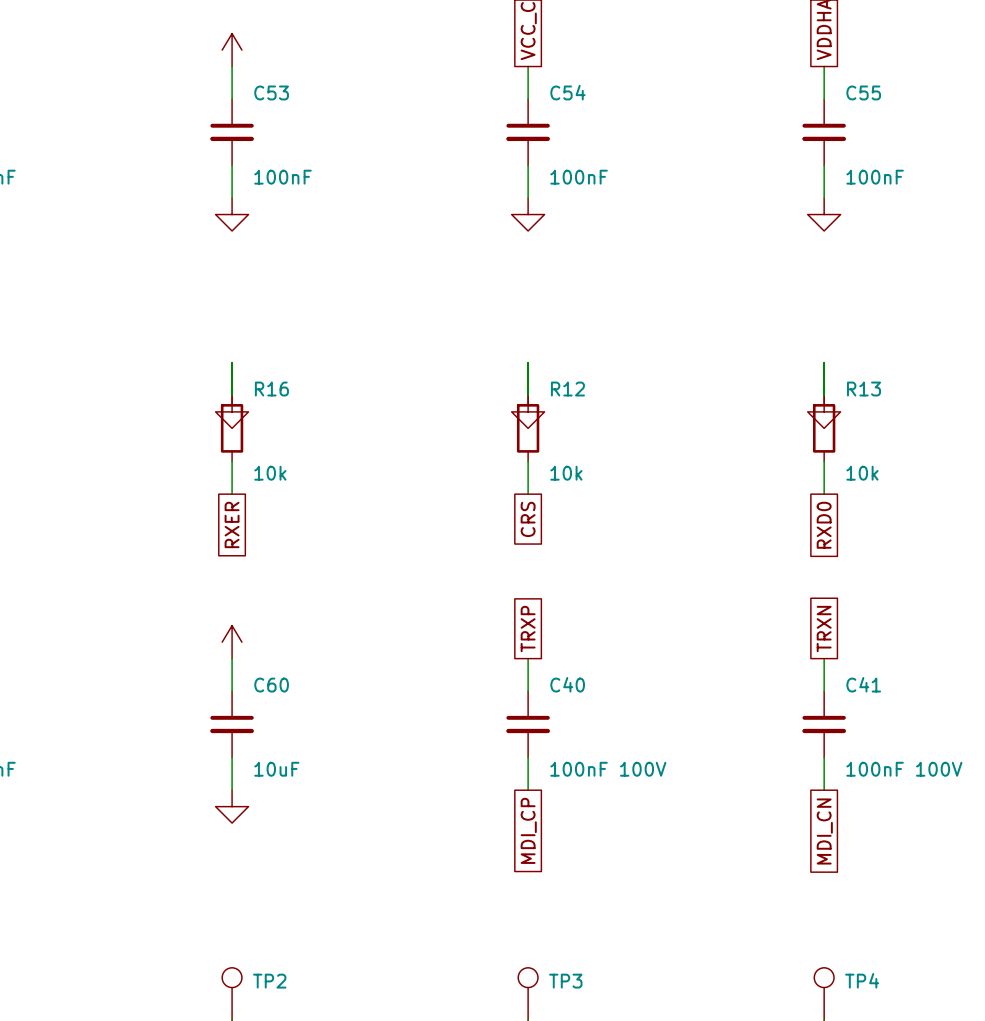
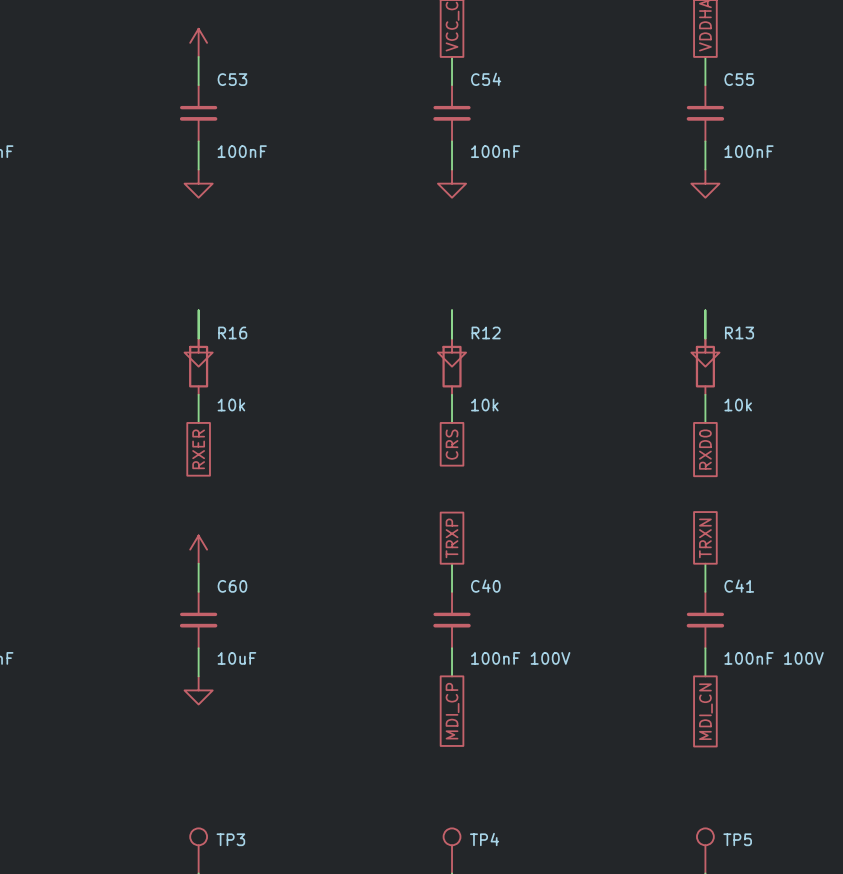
TP4 name: TP4 (862, 980) -> TP5 (737, 839)
TP2 name: TP2 (269, 981) -> TP3 (230, 839)
TP3 name: TP3 (565, 981) -> TP4 (484, 839)

